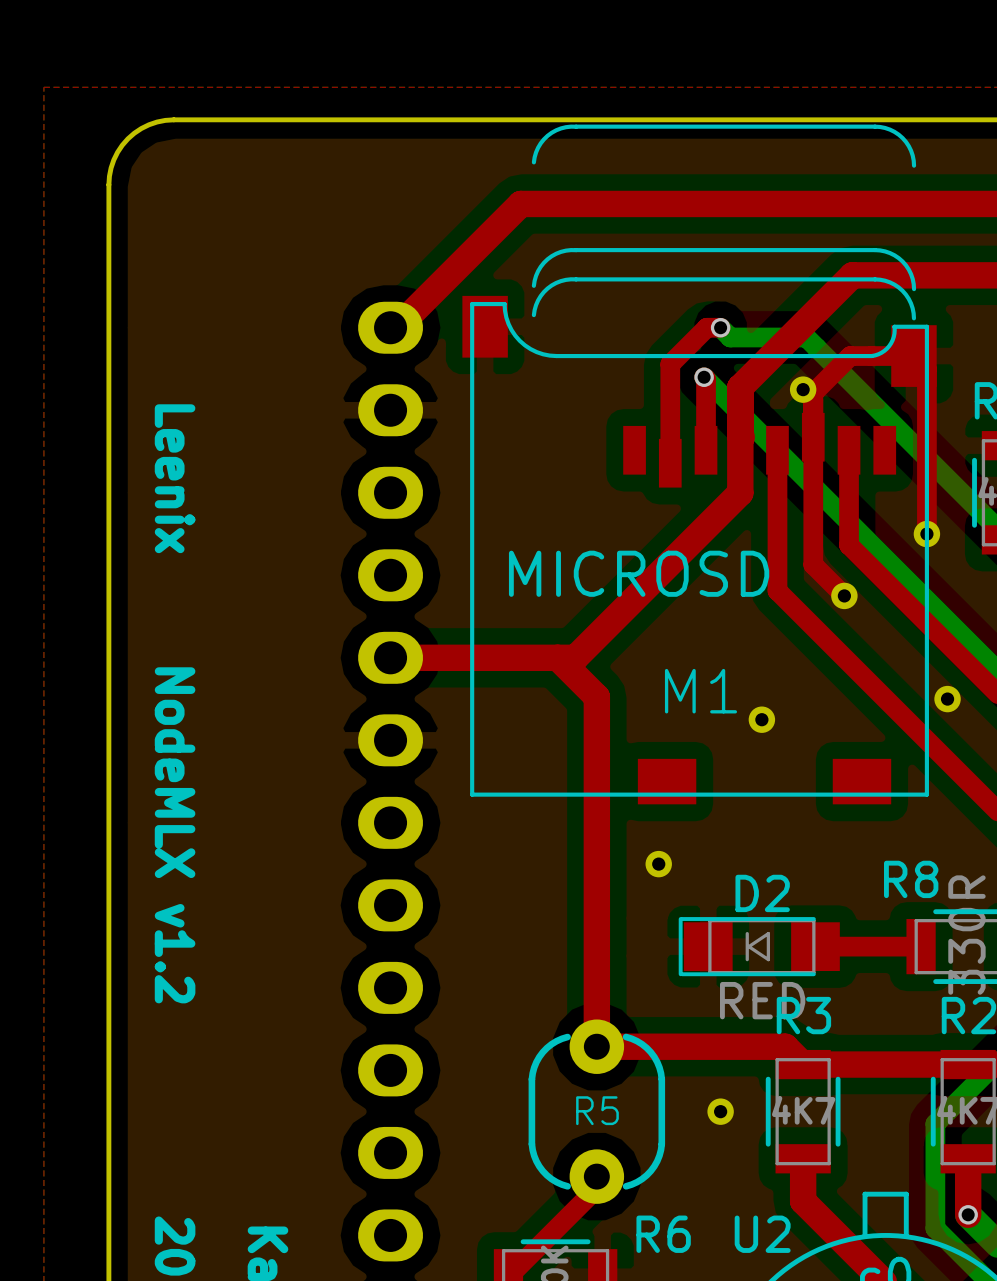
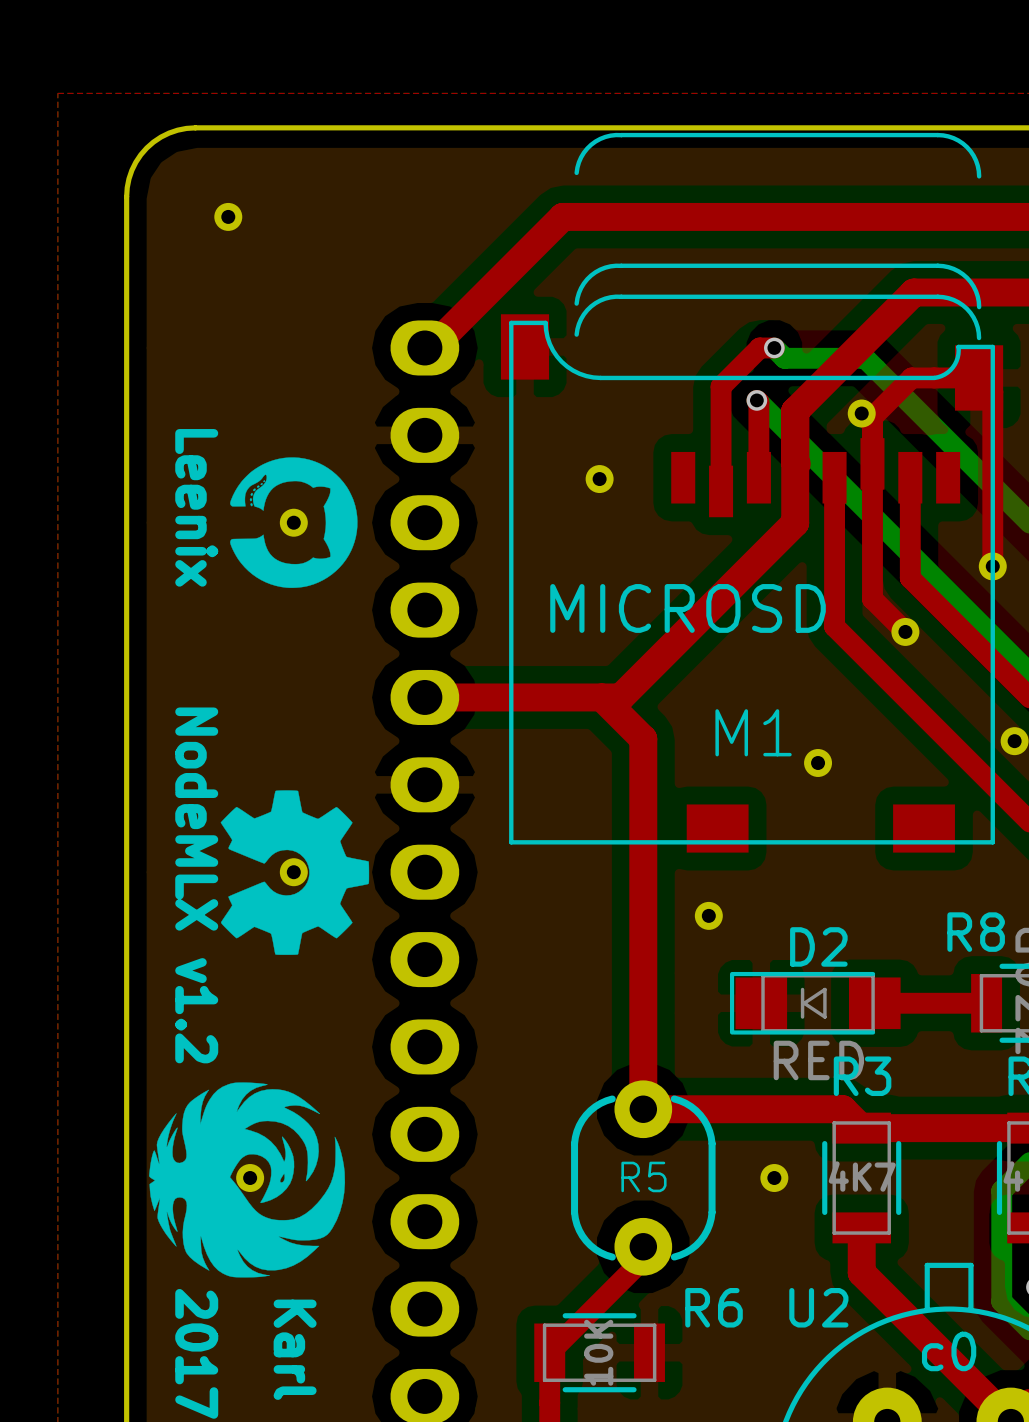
part: none -> (228, 216)
drawing: none -> [230, 457, 358, 588]
part: none -> (599, 479)
part: none -> (293, 522)
drawing: none -> [220, 790, 370, 955]
part: none -> (293, 872)
drawing: none -> [149, 1082, 346, 1278]
part: none -> (250, 1178)

